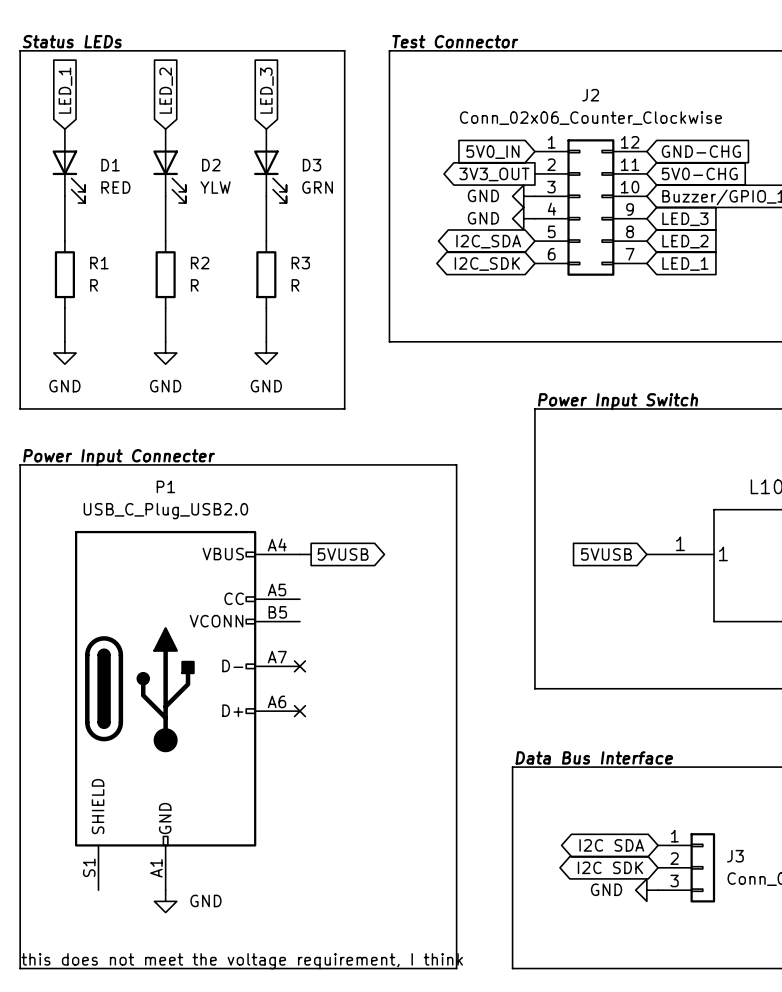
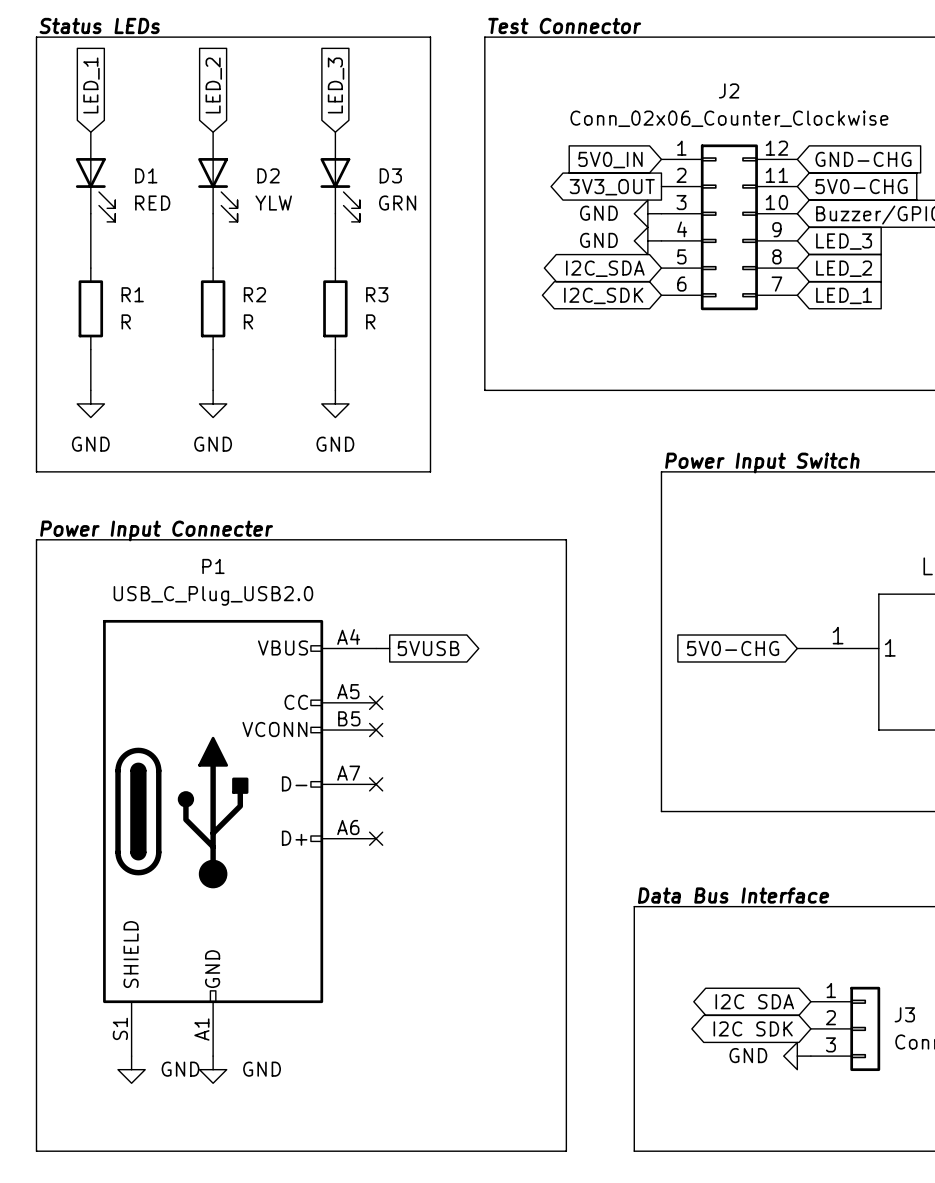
global label: 5VUSB (606, 554) -> 5V0-CHG (733, 648)
no-connect mark: none -> (376, 702)
no-connect mark: none -> (376, 730)
power symbol: none -> GND (131, 1069)
text: this does not meet the voltage requirement, I think (242, 961) -> none

